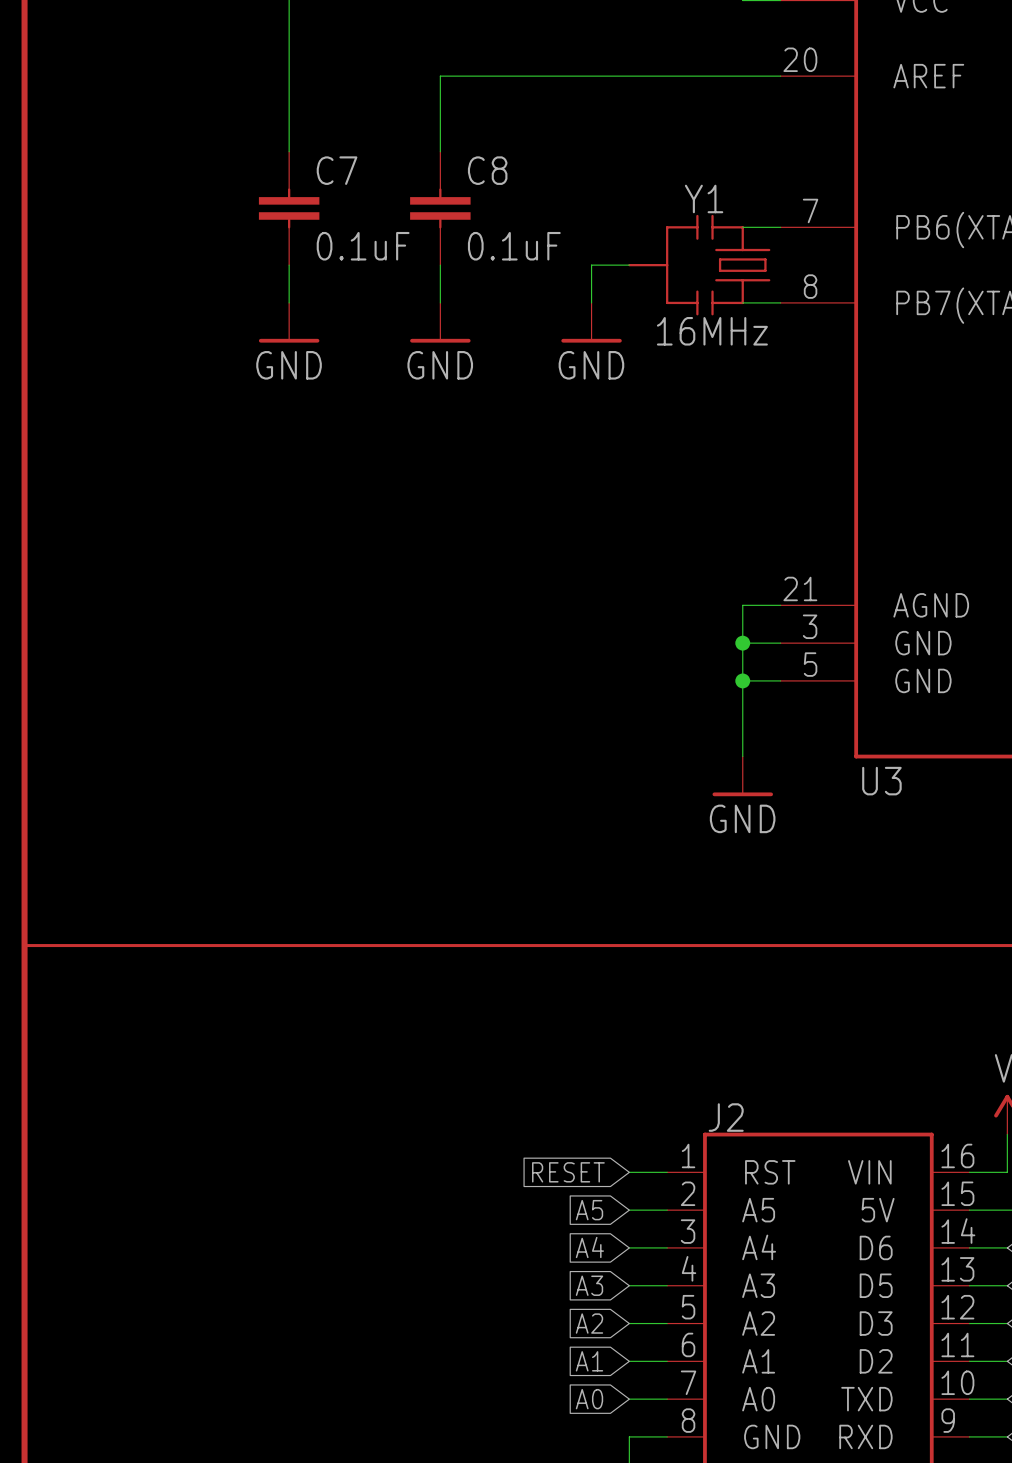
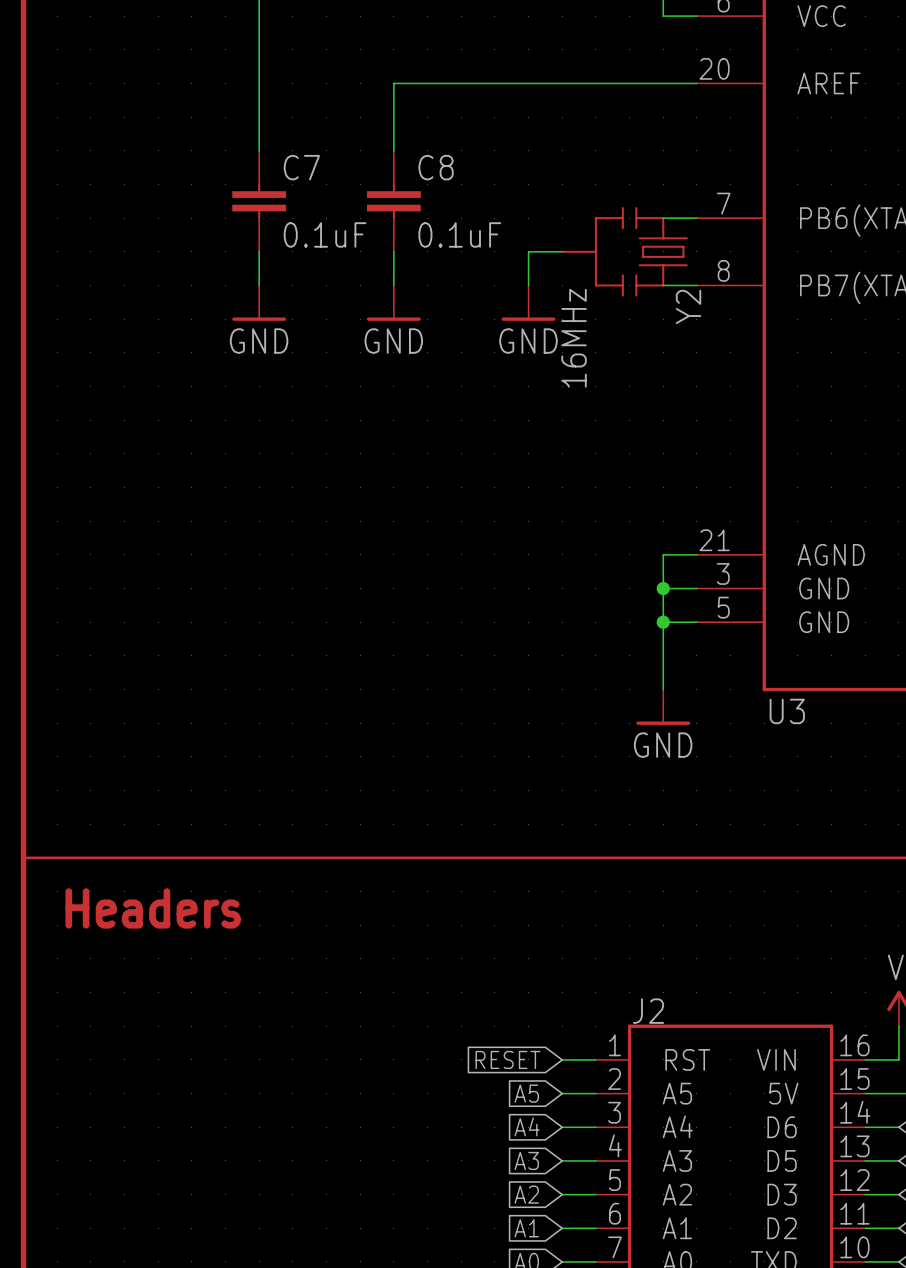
Y1 name: Y1 (704, 198) -> Y2 (688, 306)
Y1 value rotation: 0° (712, 331) -> 90° counterclockwise (574, 338)
text: none -> Headers (153, 908)

